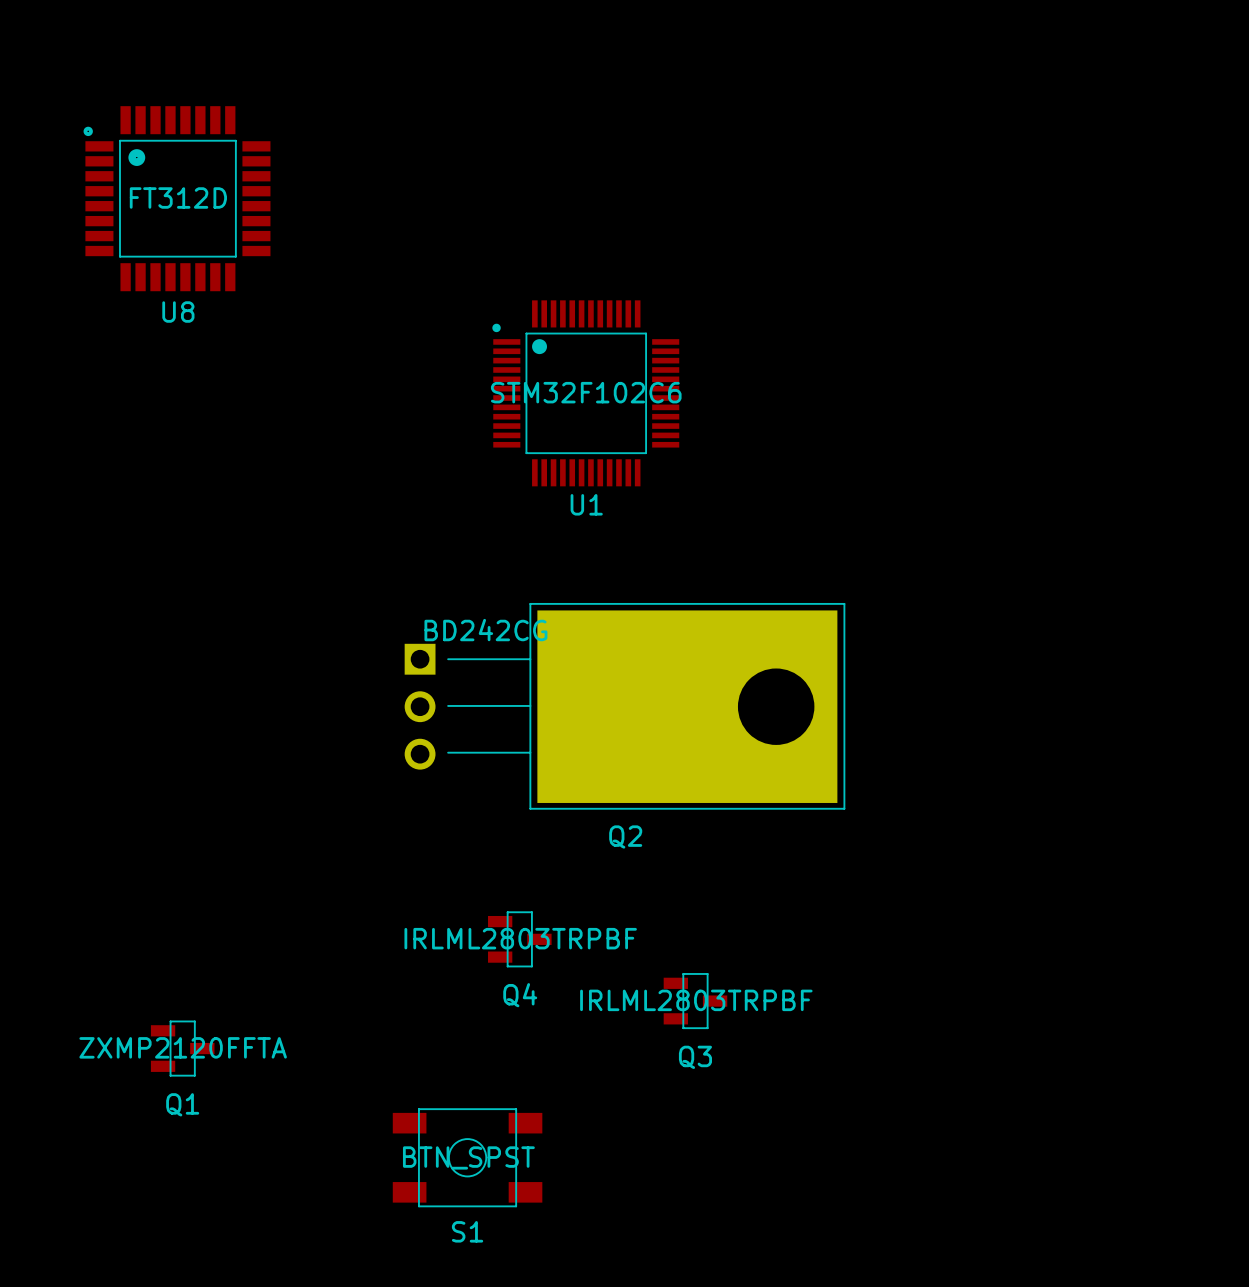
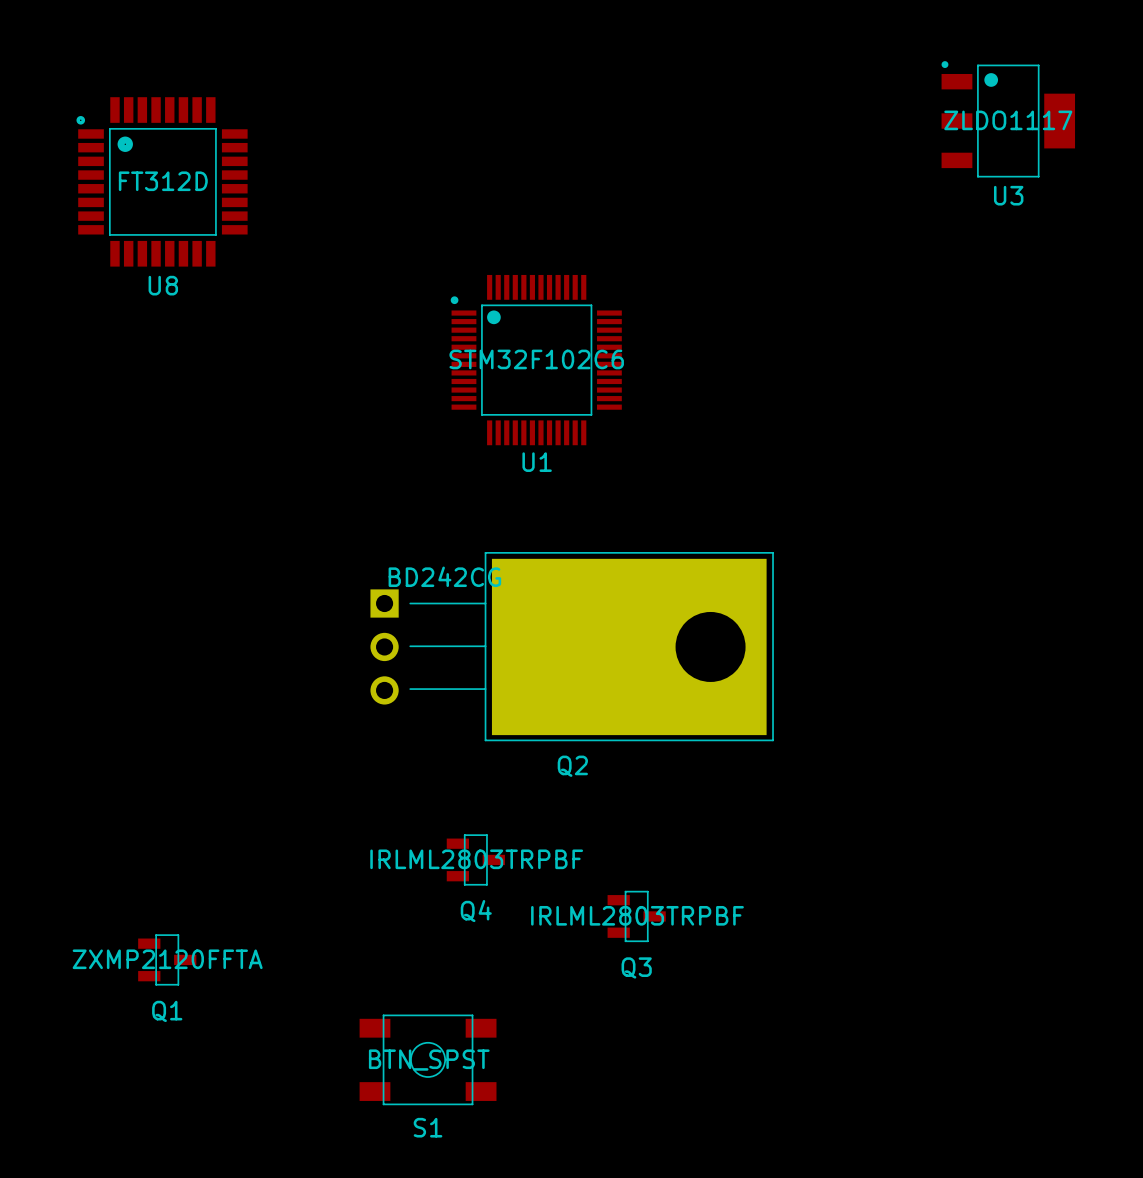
U3: none -> ZLDO1117 (1008, 119)

